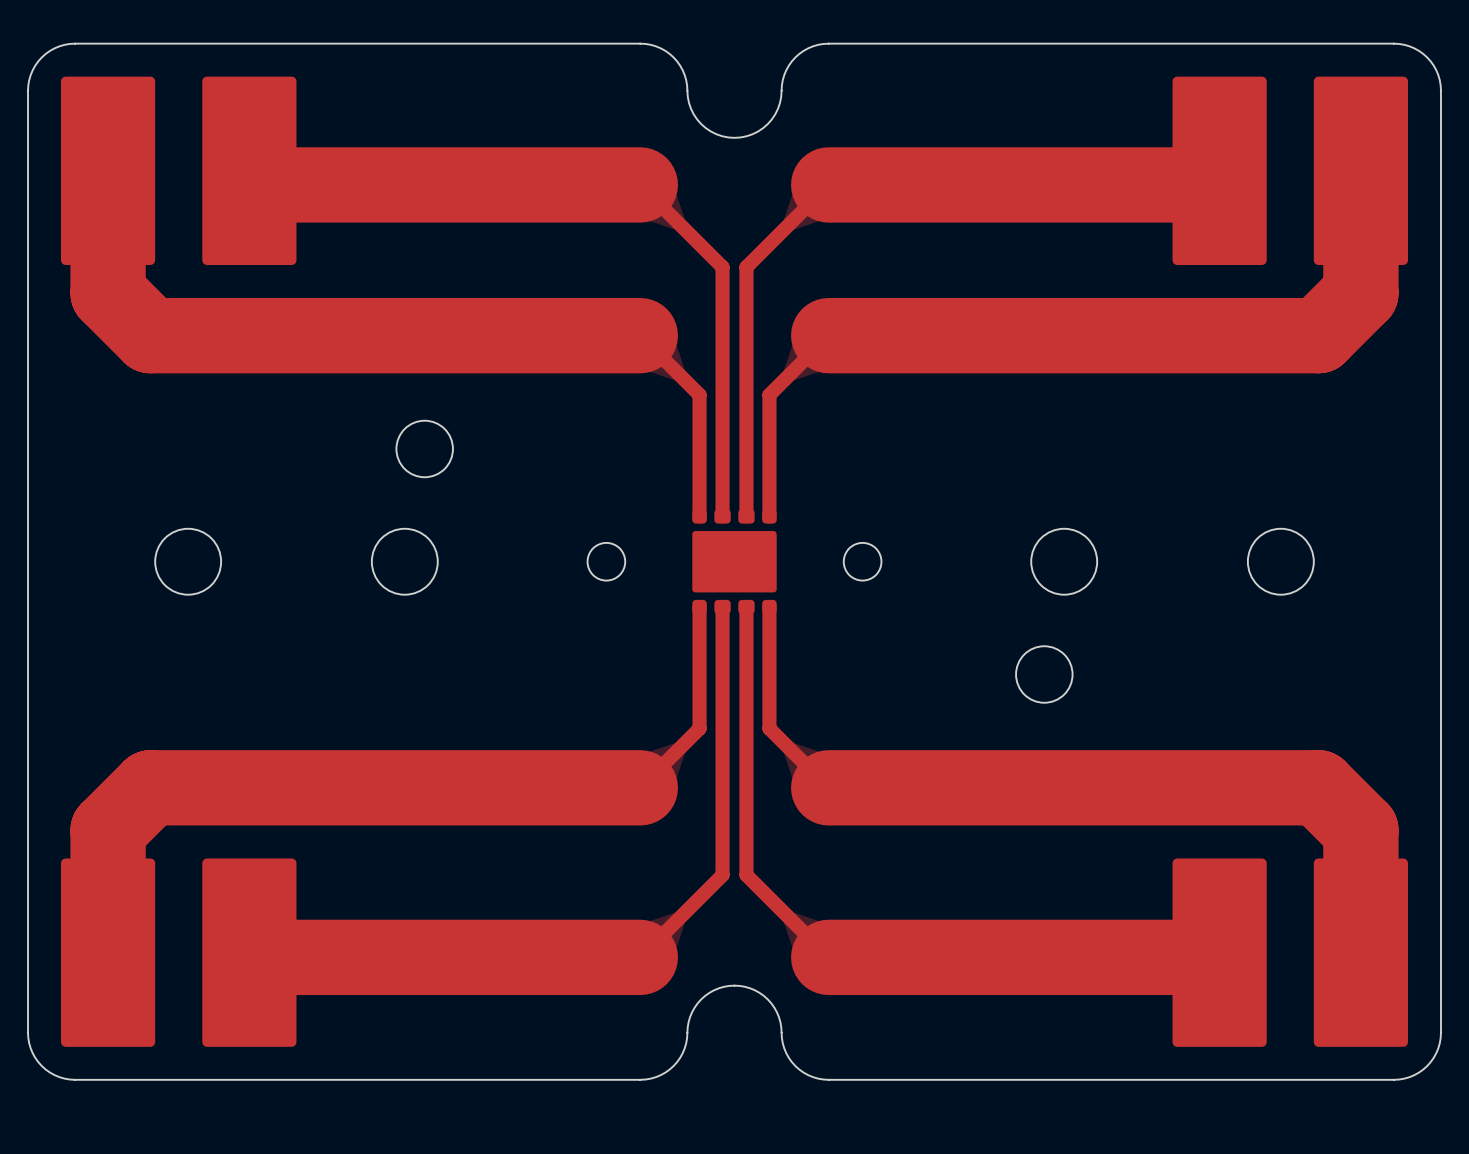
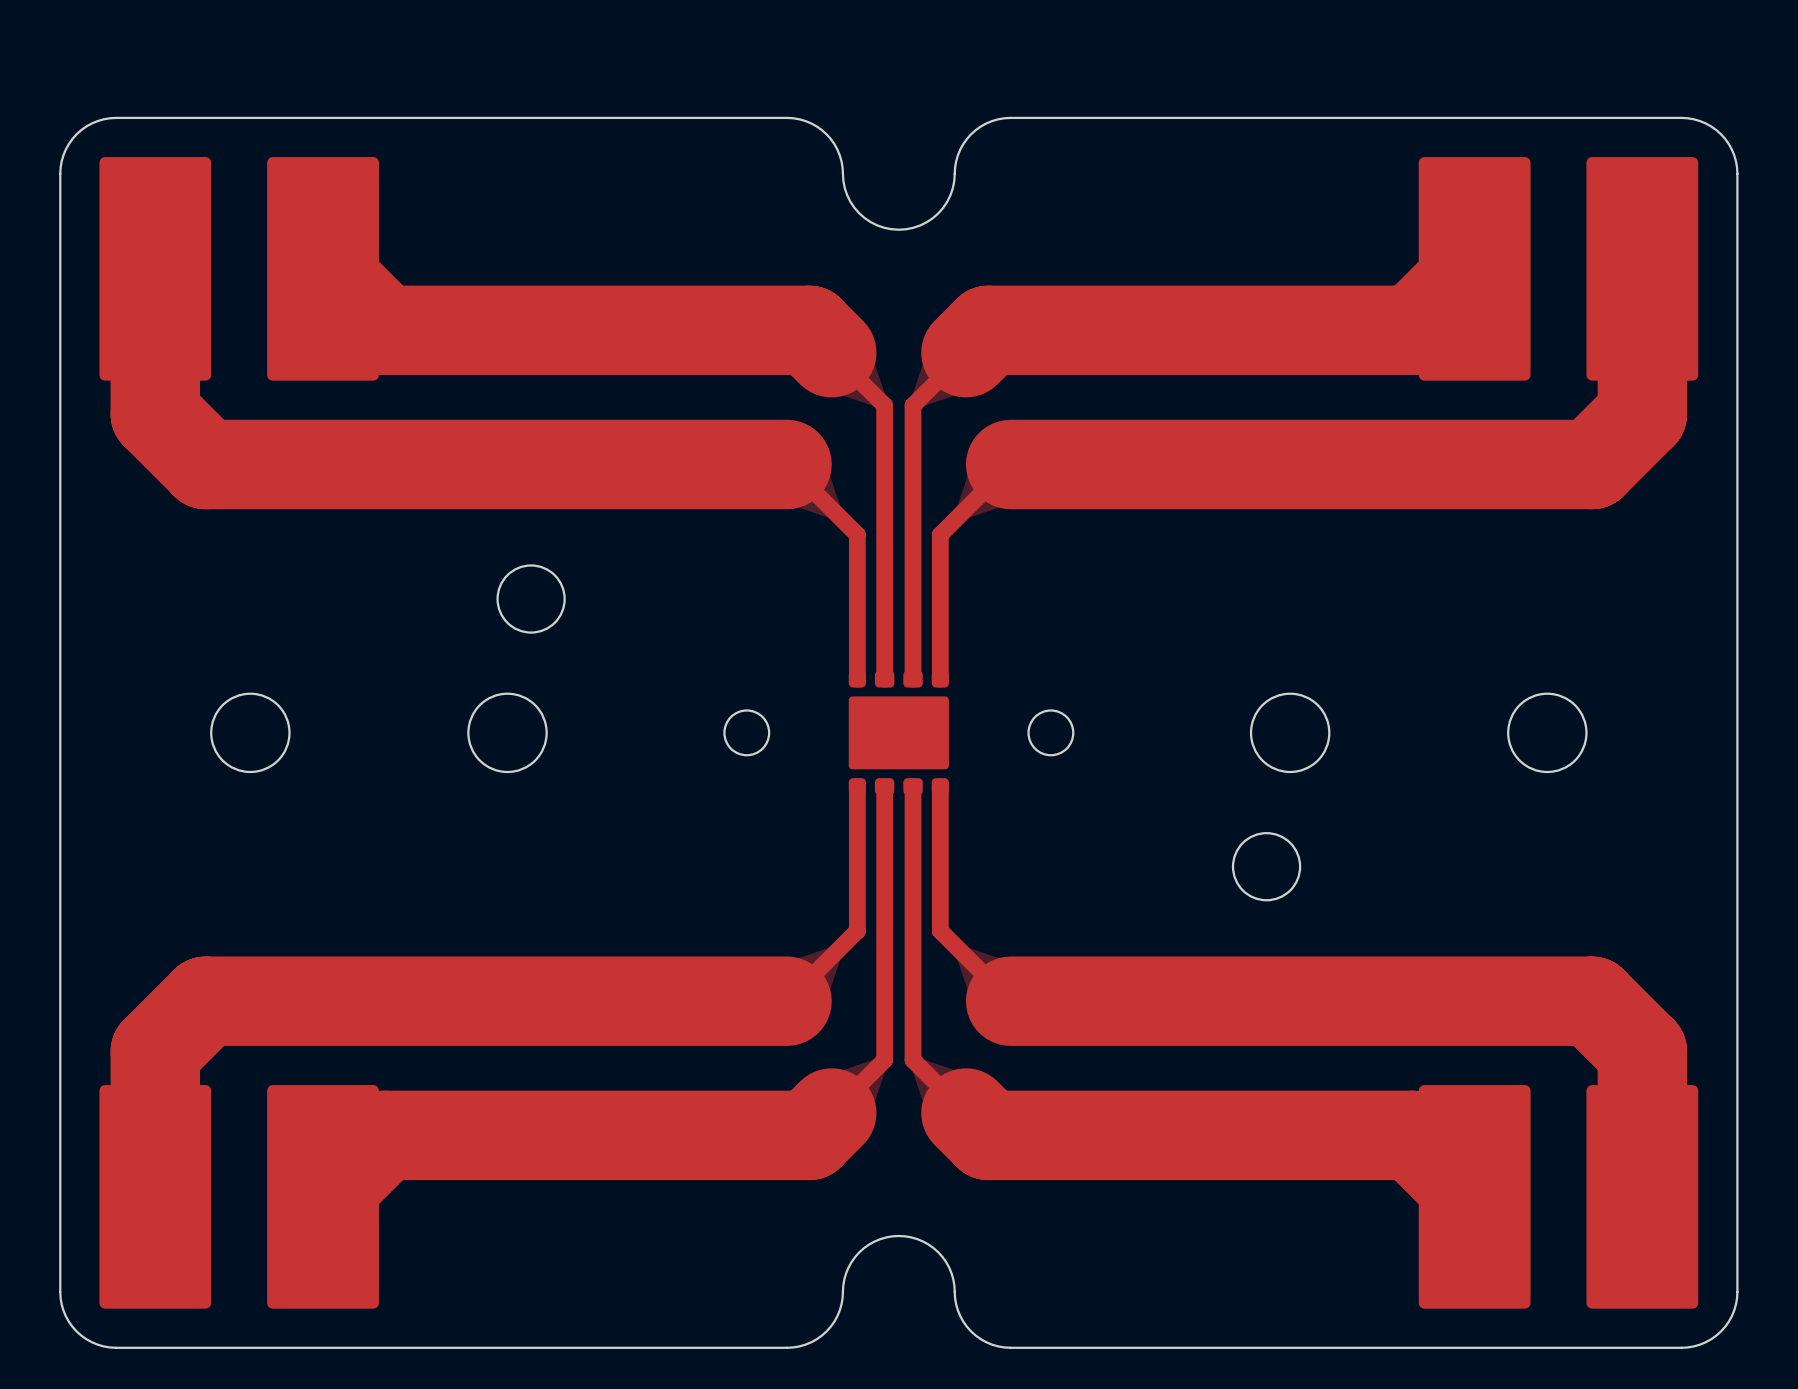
top track: (263, 184) (640, 184) (722, 267) (722, 286) -> (339, 285) (384, 330) (809, 330) (884, 405)
top track: (1205, 184) (828, 184) (746, 267) (746, 286) -> (1457, 285) (1413, 330) (988, 330) (913, 405)
top track: (722, 837) (722, 875) (640, 957) (254, 957) (249, 952) -> (884, 1060) (809, 1135) (384, 1135) (323, 1196)
top track: (746, 837) (746, 875) (828, 957) (1214, 957) (1219, 952) -> (913, 1060) (988, 1135) (1413, 1135) (1474, 1196)

